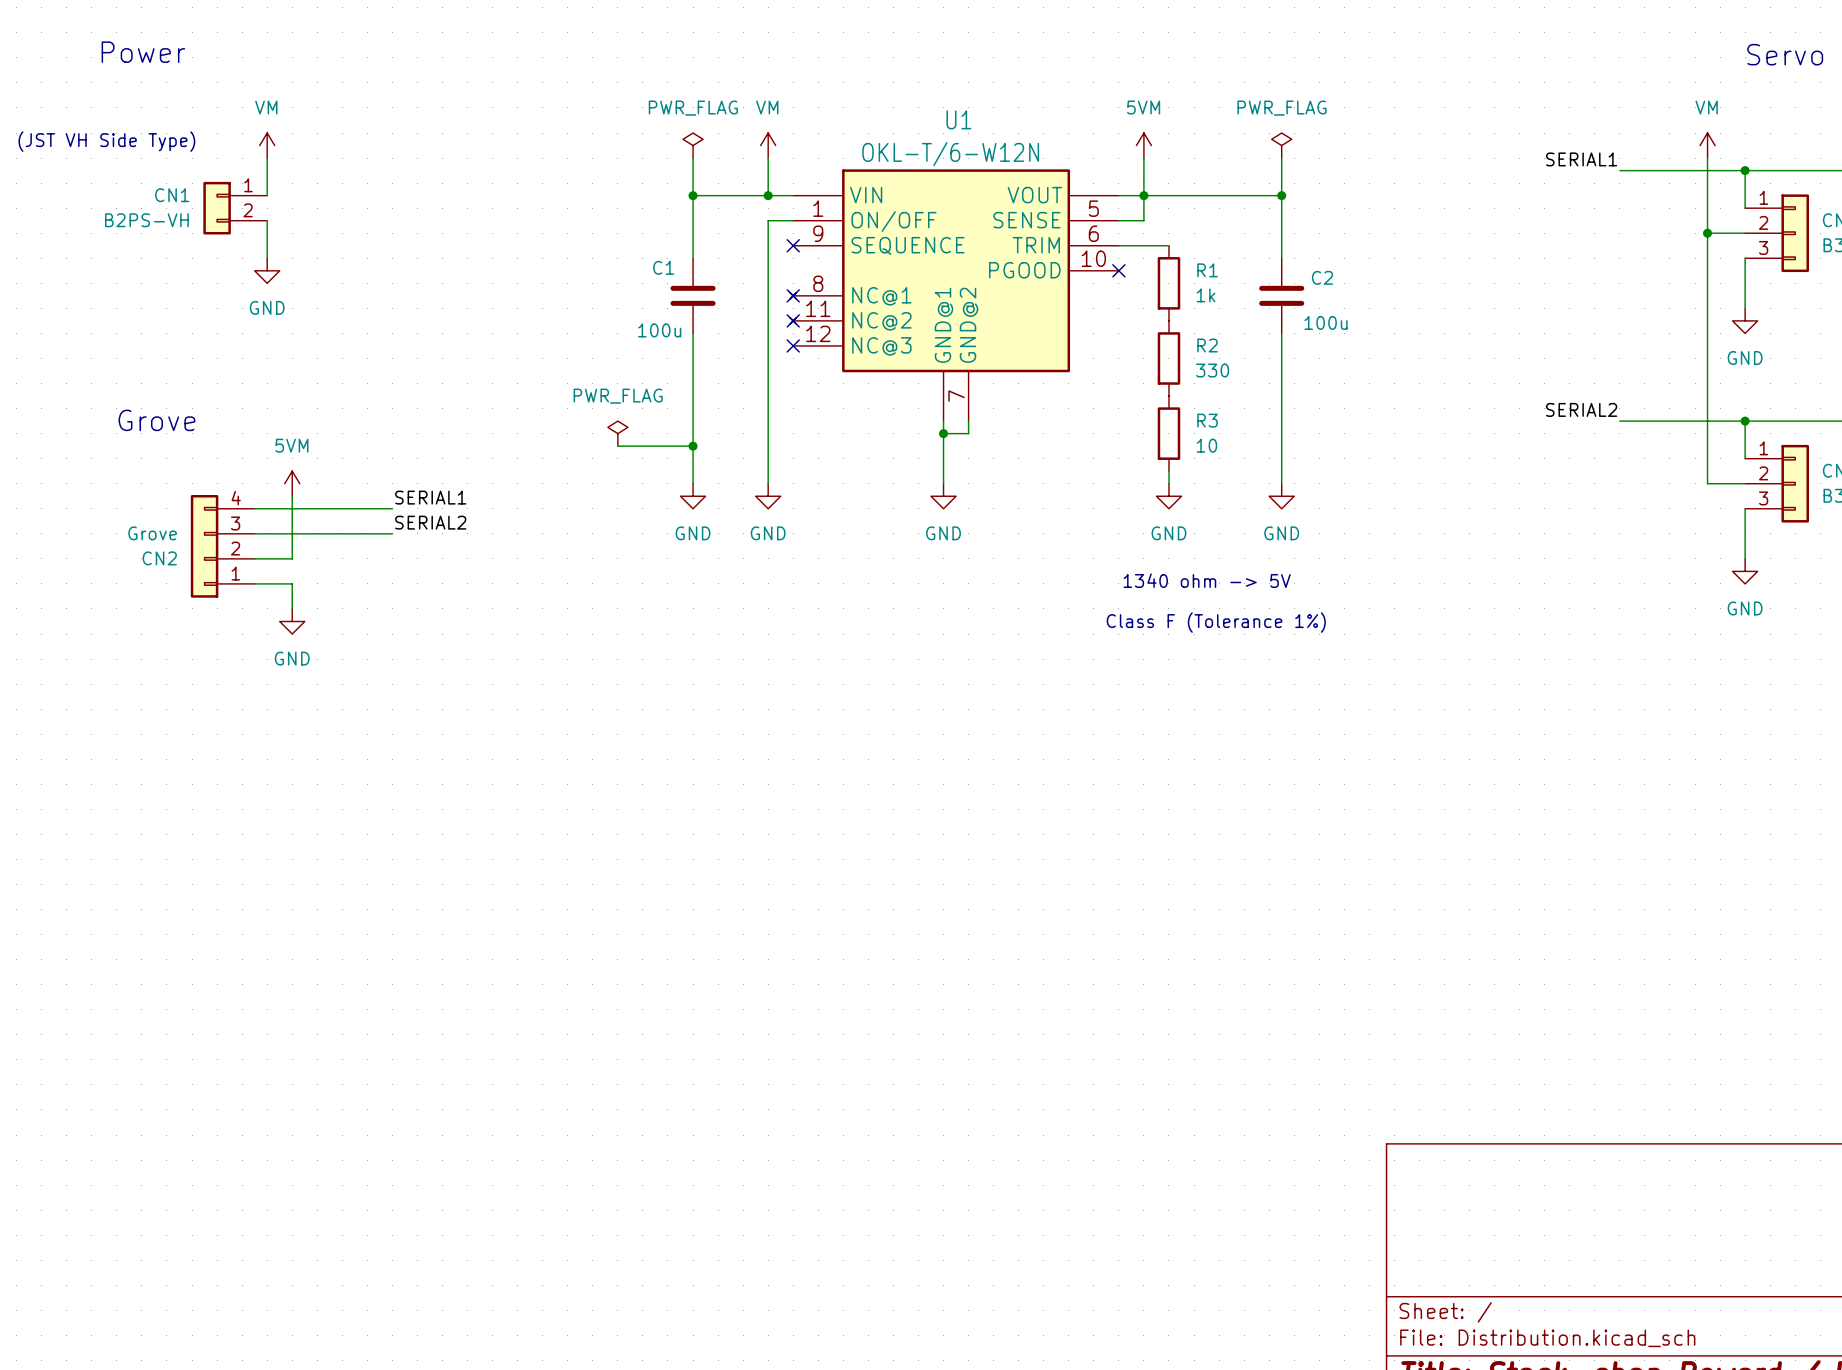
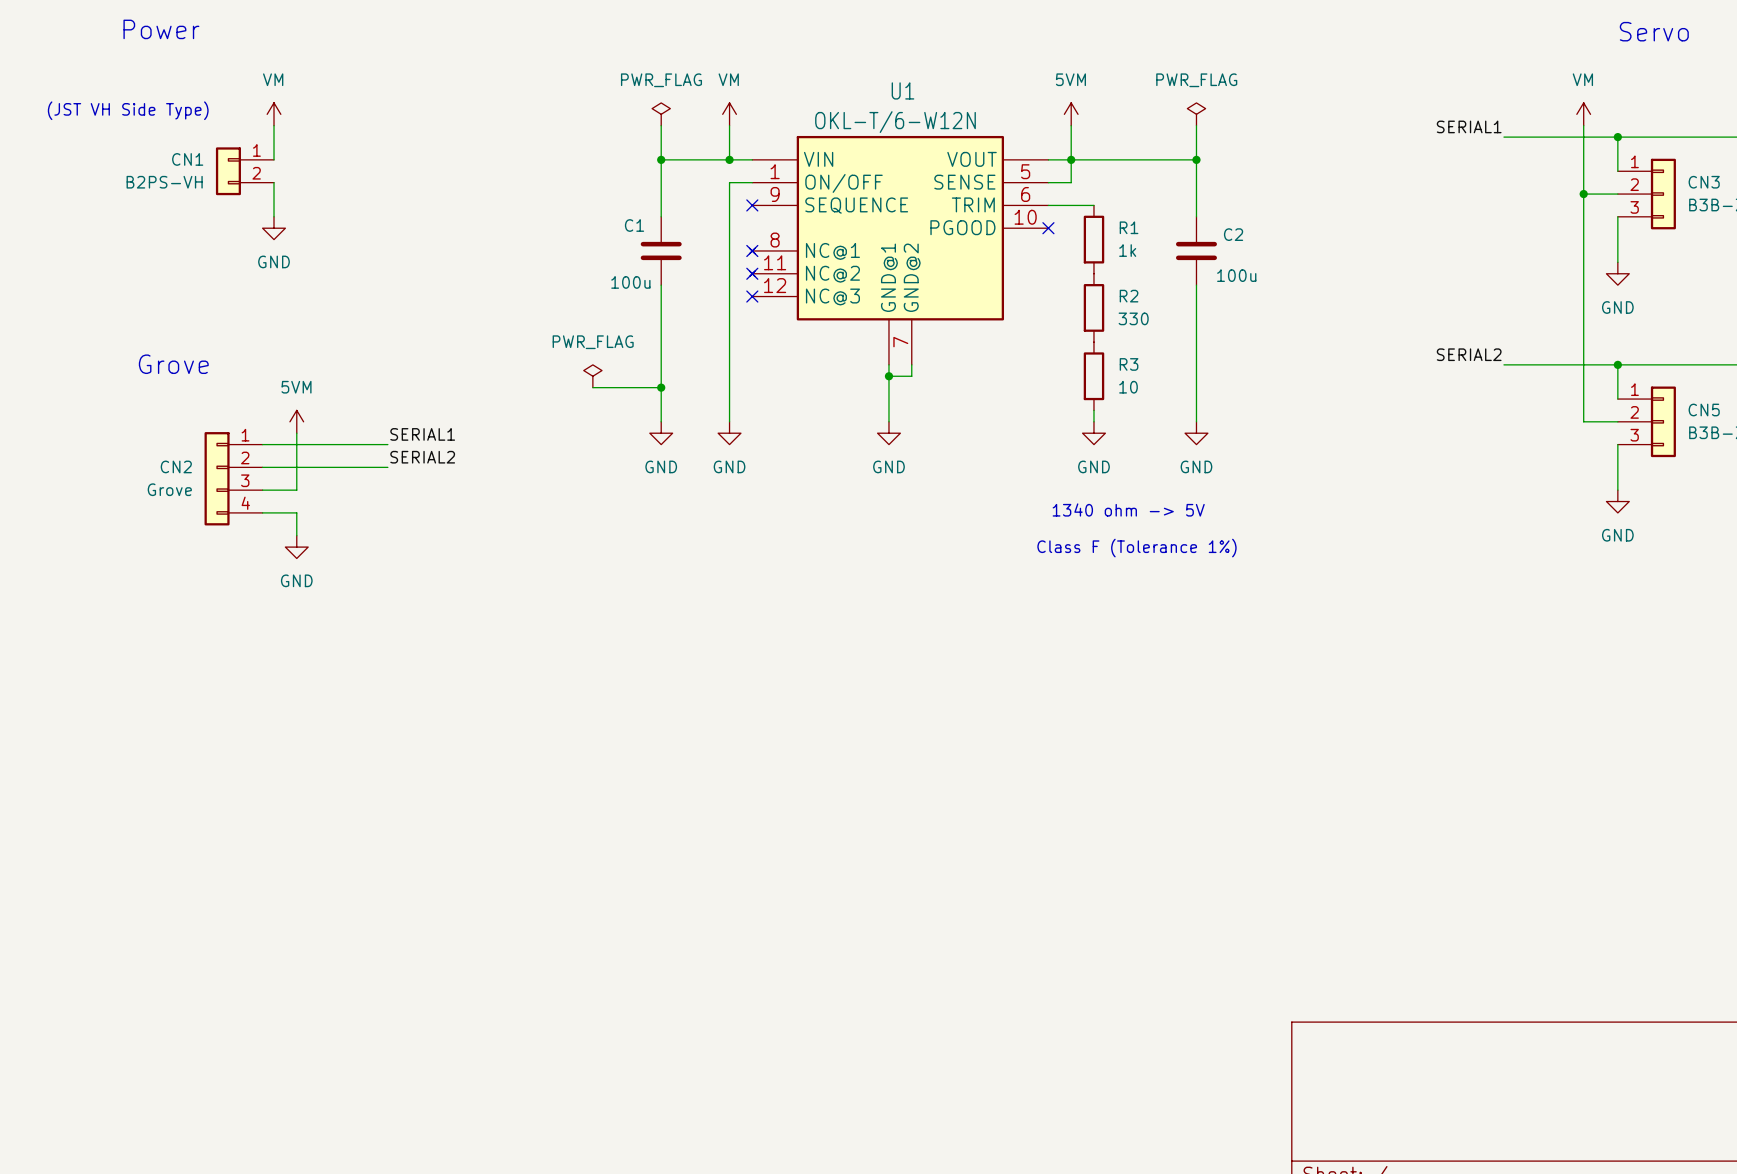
CN2 flip: as is (204, 546) -> up-down (217, 478)

